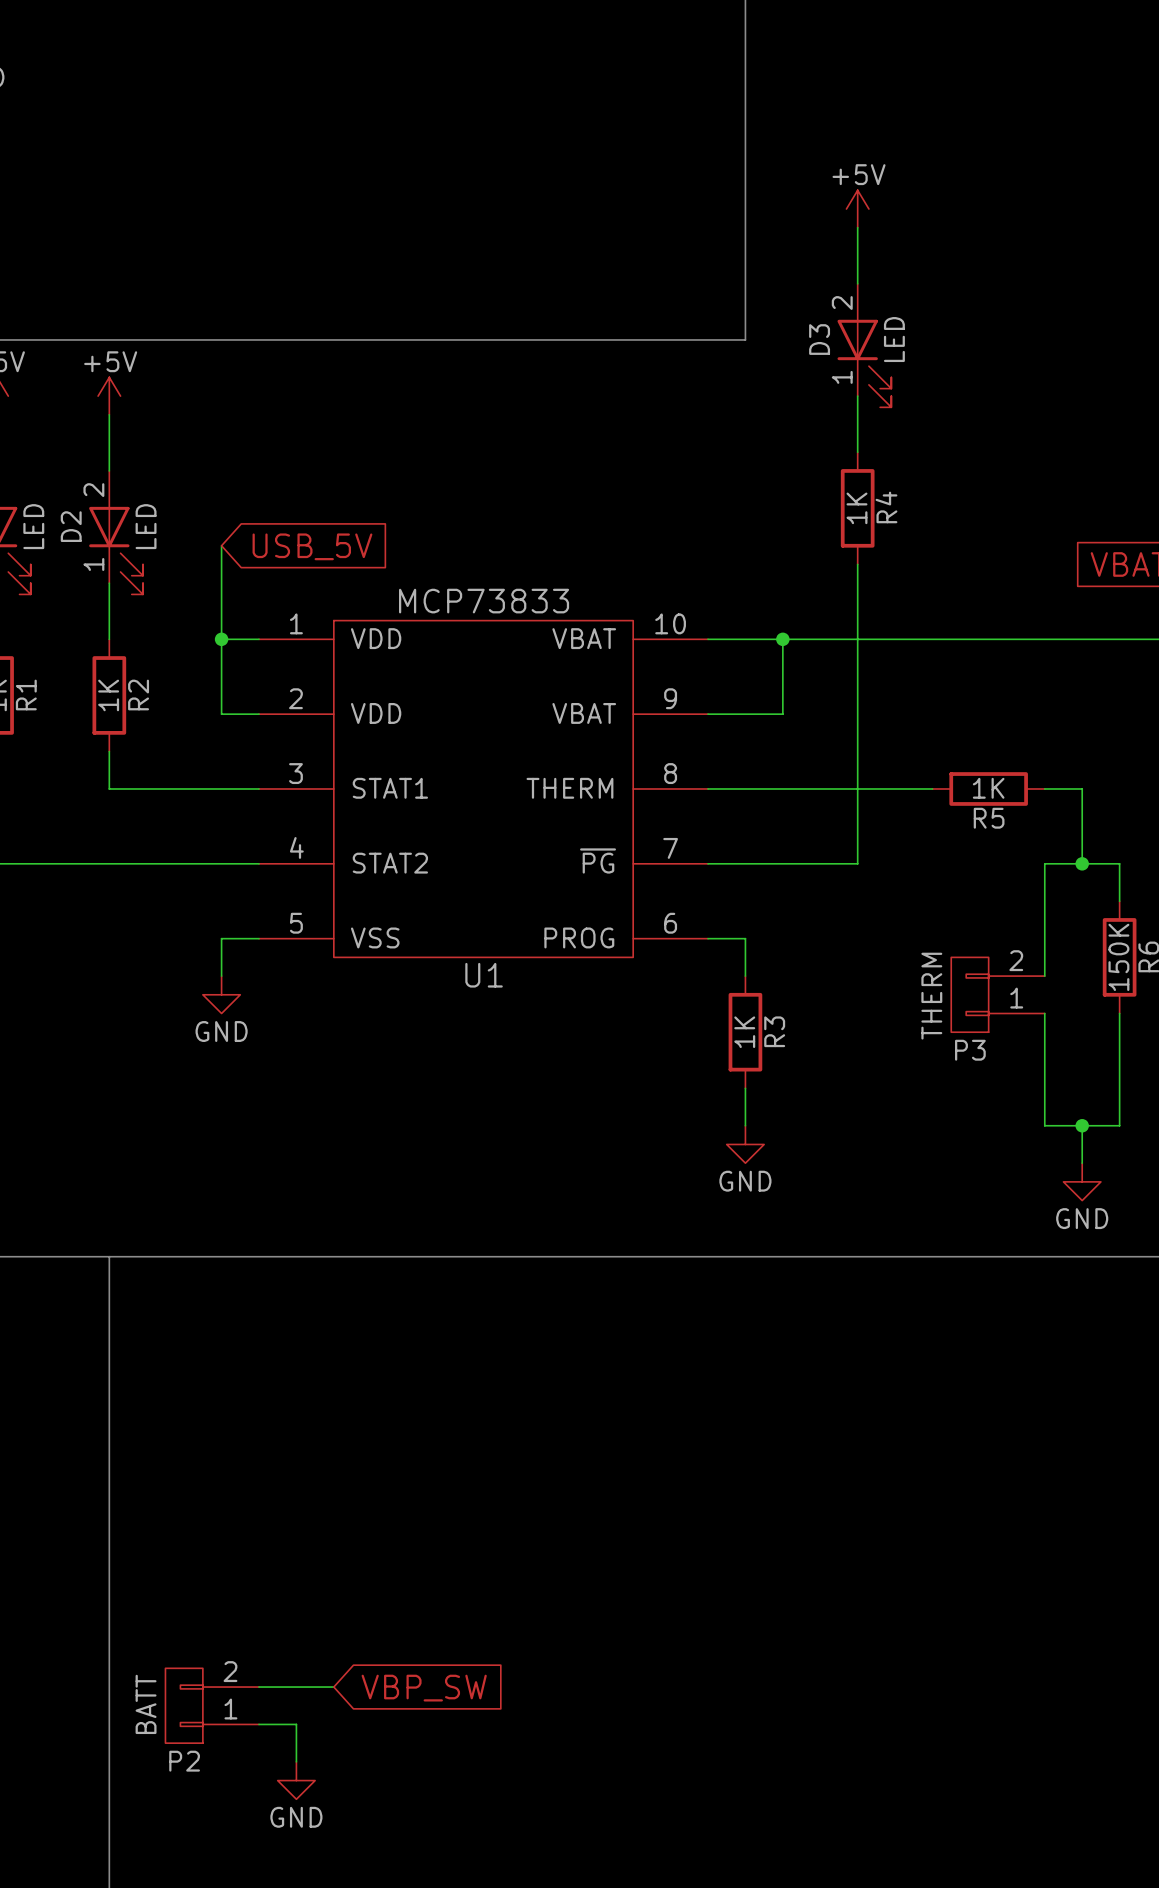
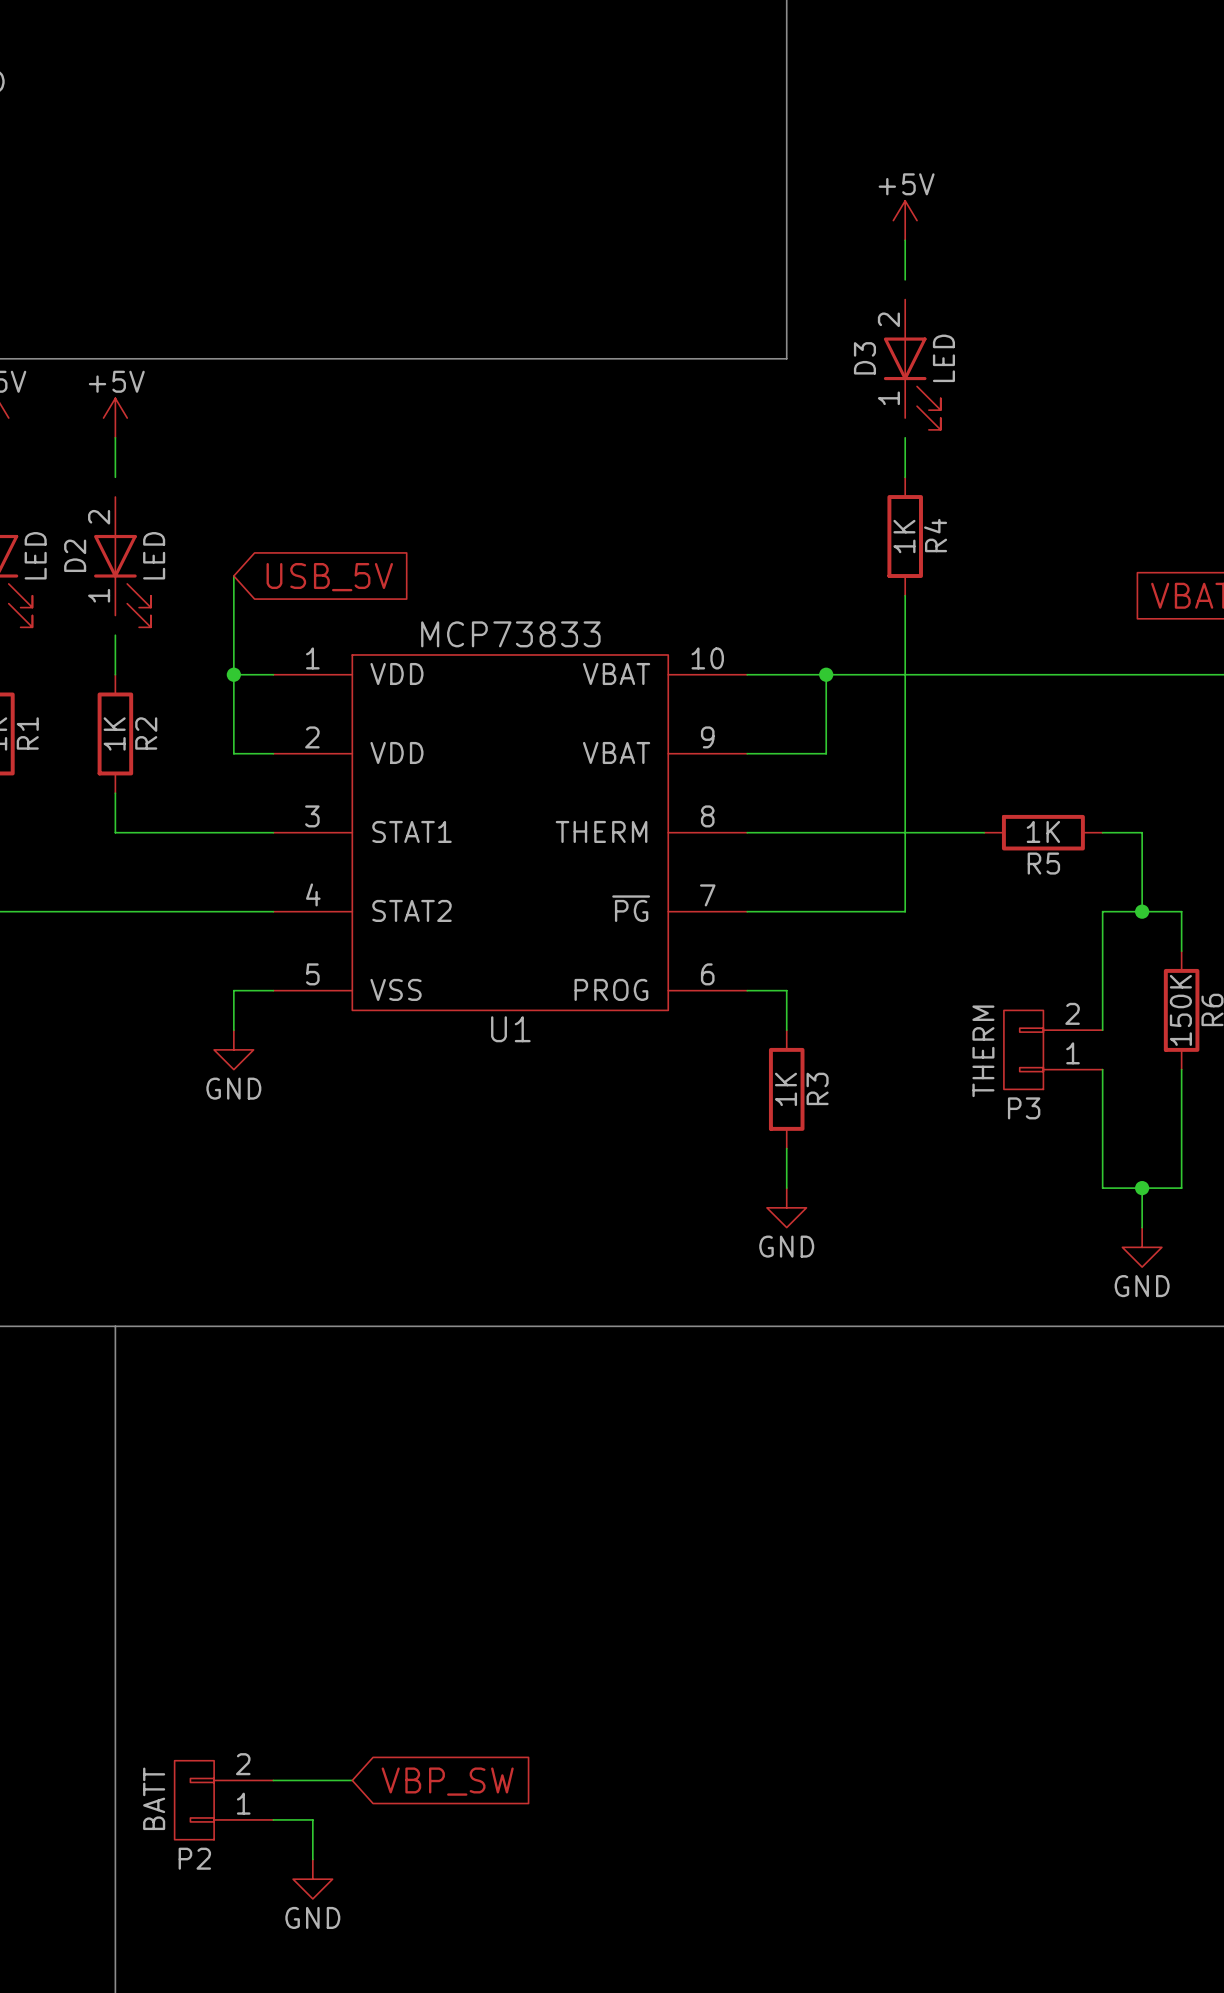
wire: (857, 265) (857, 283) -> none
wire: (857, 396) (857, 414) -> none
wire: (109, 452) (109, 470) -> none
wire: (109, 583) (109, 601) -> none

